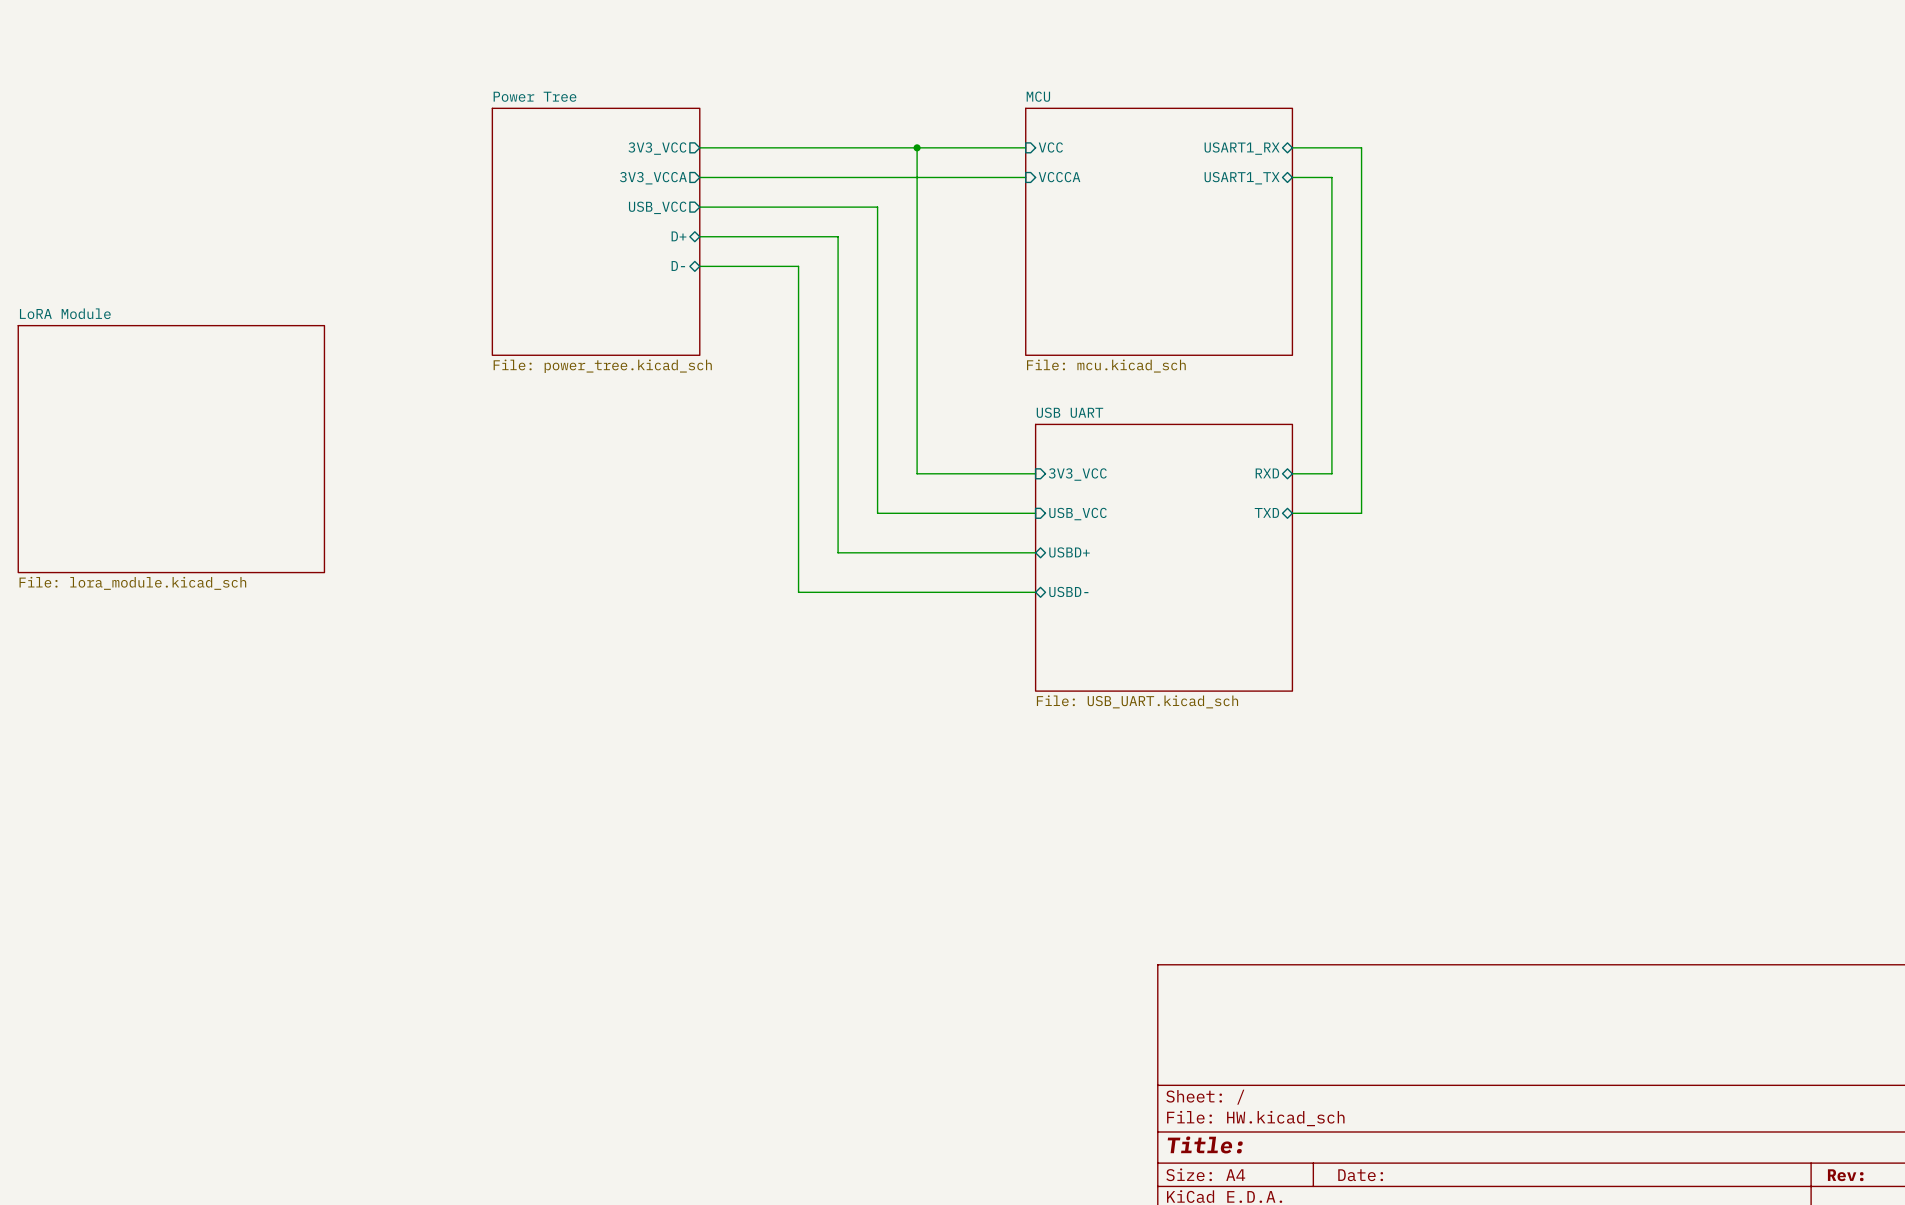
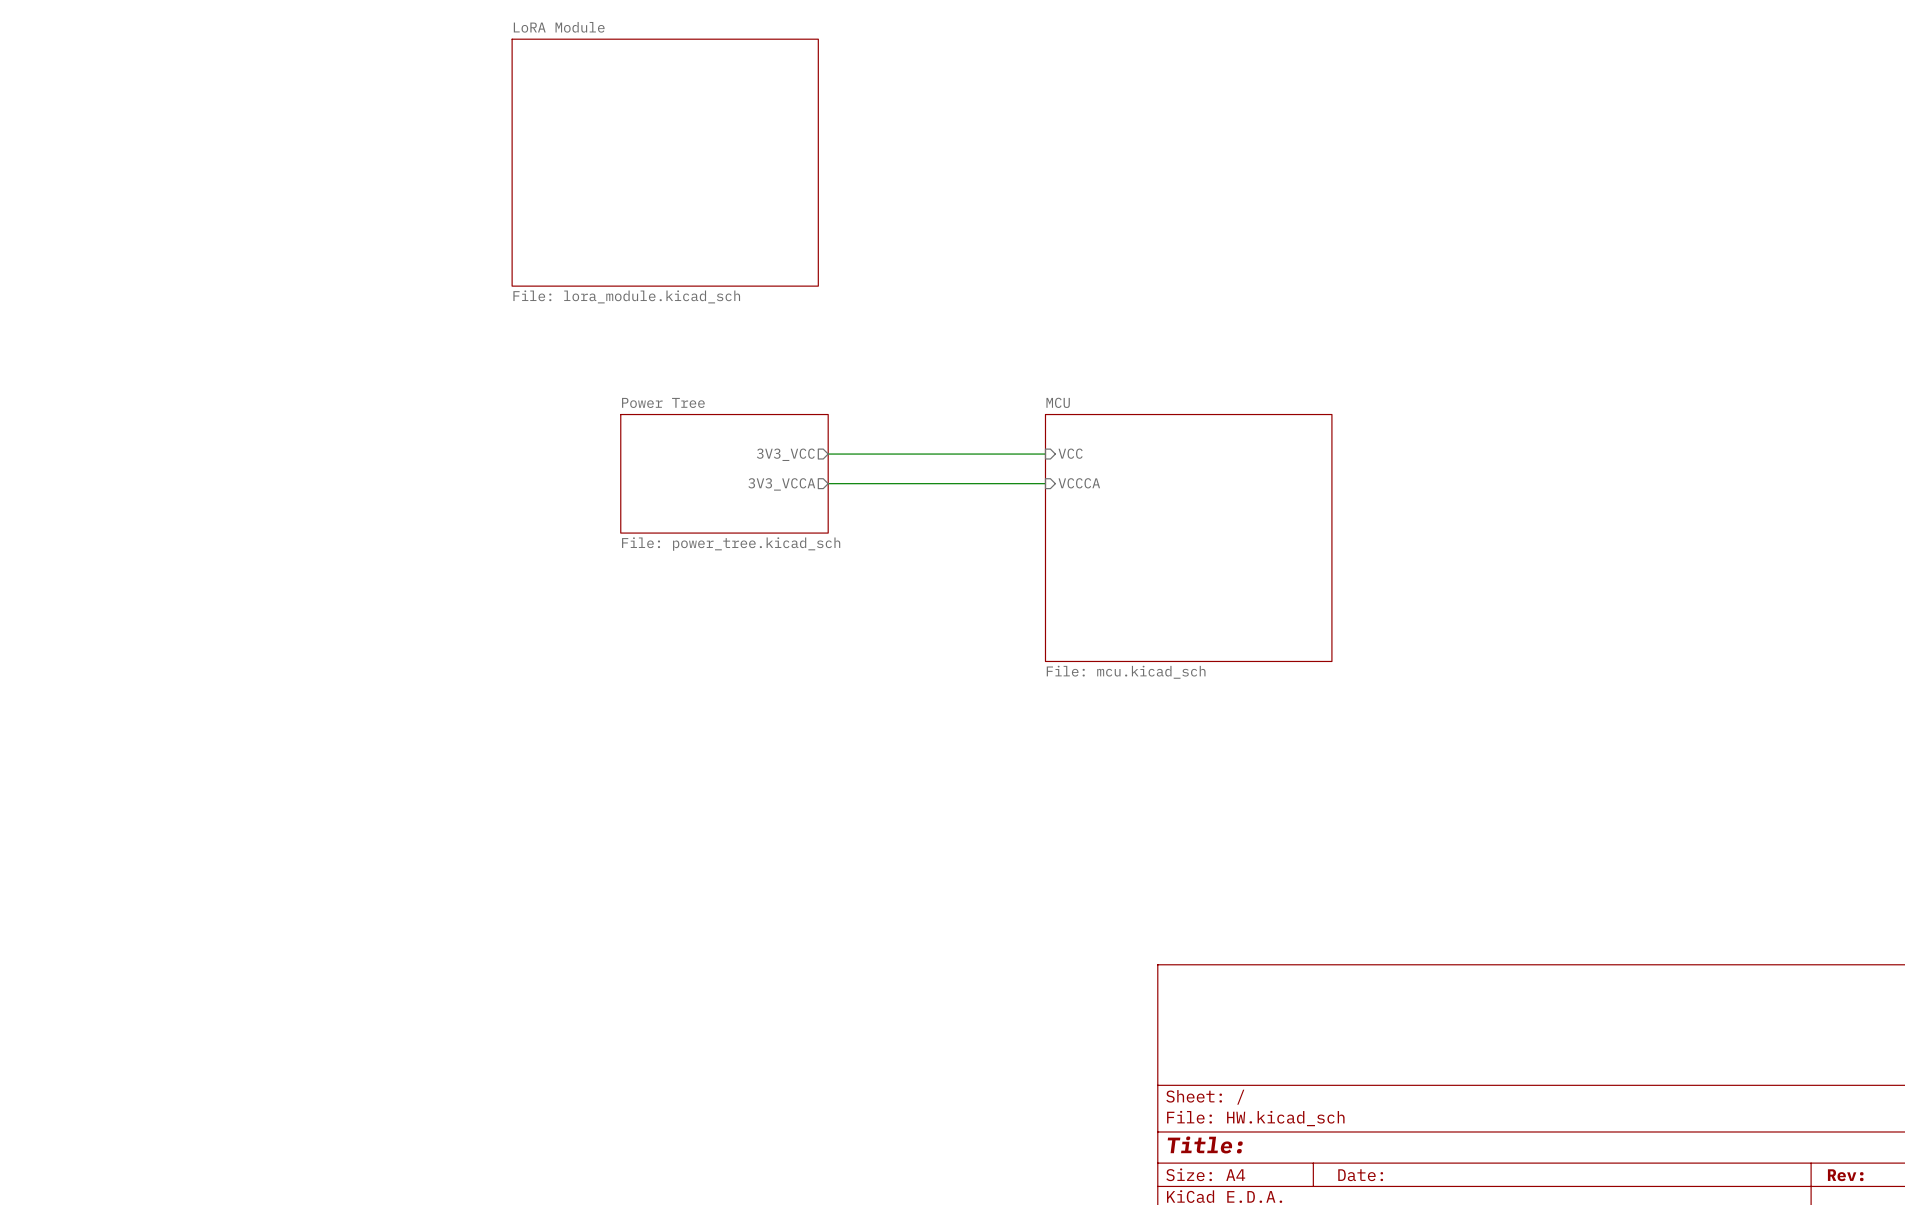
wire: (699, 147) (1025, 147) -> none
wire: (917, 147) (917, 473) (1035, 473) -> none
junction: (917, 147) -> none
sheet pin: VCC (1050, 147) -> none
wire: (1292, 147) (1361, 147) (1361, 513) (1292, 513) -> none
sheet pin: 3V3_VCC (657, 148) -> none
sheet pin: USART1_RX (1242, 148) -> none
sheet LoRA Module: none -> File: lora_module.kicad_sch (665, 162)
wire: (699, 177) (1025, 177) -> none
sheet pin: VCCCA (1059, 177) -> none
wire: (1292, 177) (1331, 177) (1331, 473) (1292, 473) -> none
sheet pin: 3V3_VCCA (653, 178) -> none
sheet pin: USART1_TX (1242, 178) -> none
sheet pin: USB_VCC (657, 207) -> none
wire: (699, 207) (877, 207) (877, 513) (1035, 513) -> none
sheet Power Tree: File: power_tree.kicad_sch (596, 231) -> none
sheet MCU: File: mcu.kicad_sch (1159, 231) -> none
sheet pin: D+ (678, 236) -> none
wire: (699, 236) (838, 236) (838, 552) (1035, 552) -> none
sheet pin: D- (678, 266) -> none
wire: (699, 266) (798, 266) (798, 592) (1035, 592) -> none
sheet LoRA Module: File: lora_module.kicad_sch (171, 449) -> none
sheet pin: none -> VCC (1070, 453)
sheet pin: none -> 3V3_VCC (785, 454)
wire: none -> (828, 454) (1045, 454)
sheet Power Tree: none -> File: power_tree.kicad_sch (724, 473)
sheet pin: RXD (1267, 473) -> none
sheet pin: 3V3_VCC (1077, 474) -> none
wire: none -> (828, 483) (1045, 483)
sheet pin: none -> VCCCA (1079, 483)
sheet pin: none -> 3V3_VCCA (781, 484)
sheet pin: TXD (1266, 512) -> none
sheet pin: USB_VCC (1078, 514) -> none
sheet MCU: none -> File: mcu.kicad_sch (1188, 538)
sheet pin: USBD+ (1069, 552) -> none
sheet USB UART: File: USB_UART.kicad_sch (1164, 557) -> none
sheet pin: USBD- (1068, 591) -> none

